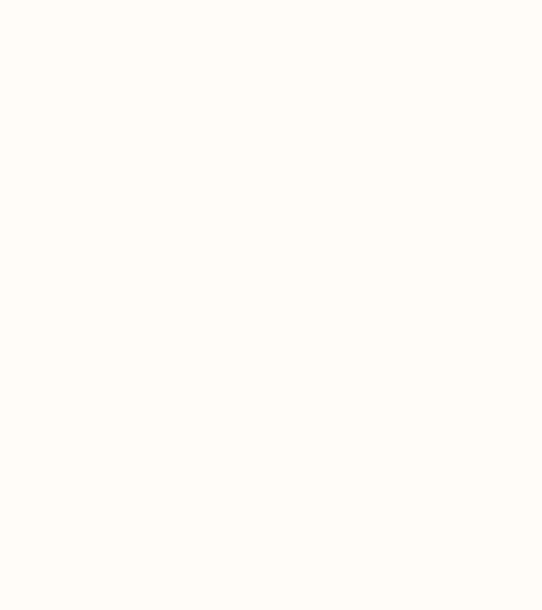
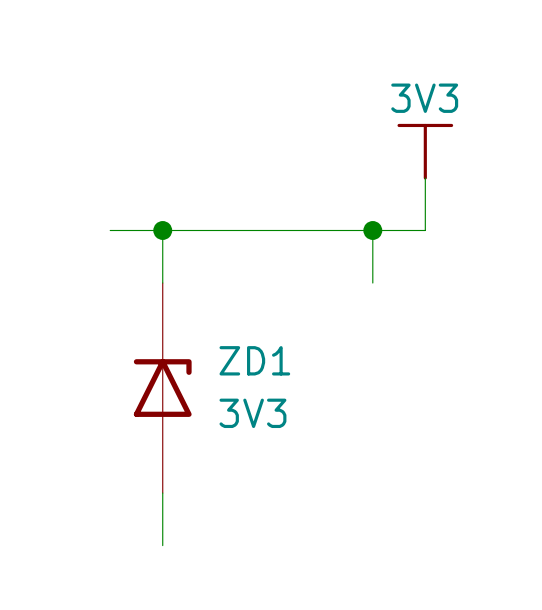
power symbol: none -> 3V3 (425, 151)
wire: none -> (425, 177) (425, 230) (110, 230)
wire: none -> (162, 230) (162, 283)
junction: none -> (162, 230)
wire: none -> (372, 230) (372, 283)
junction: none -> (372, 230)
ZD1: none -> 3V3 (162, 388)
wire: none -> (162, 493) (162, 545)

